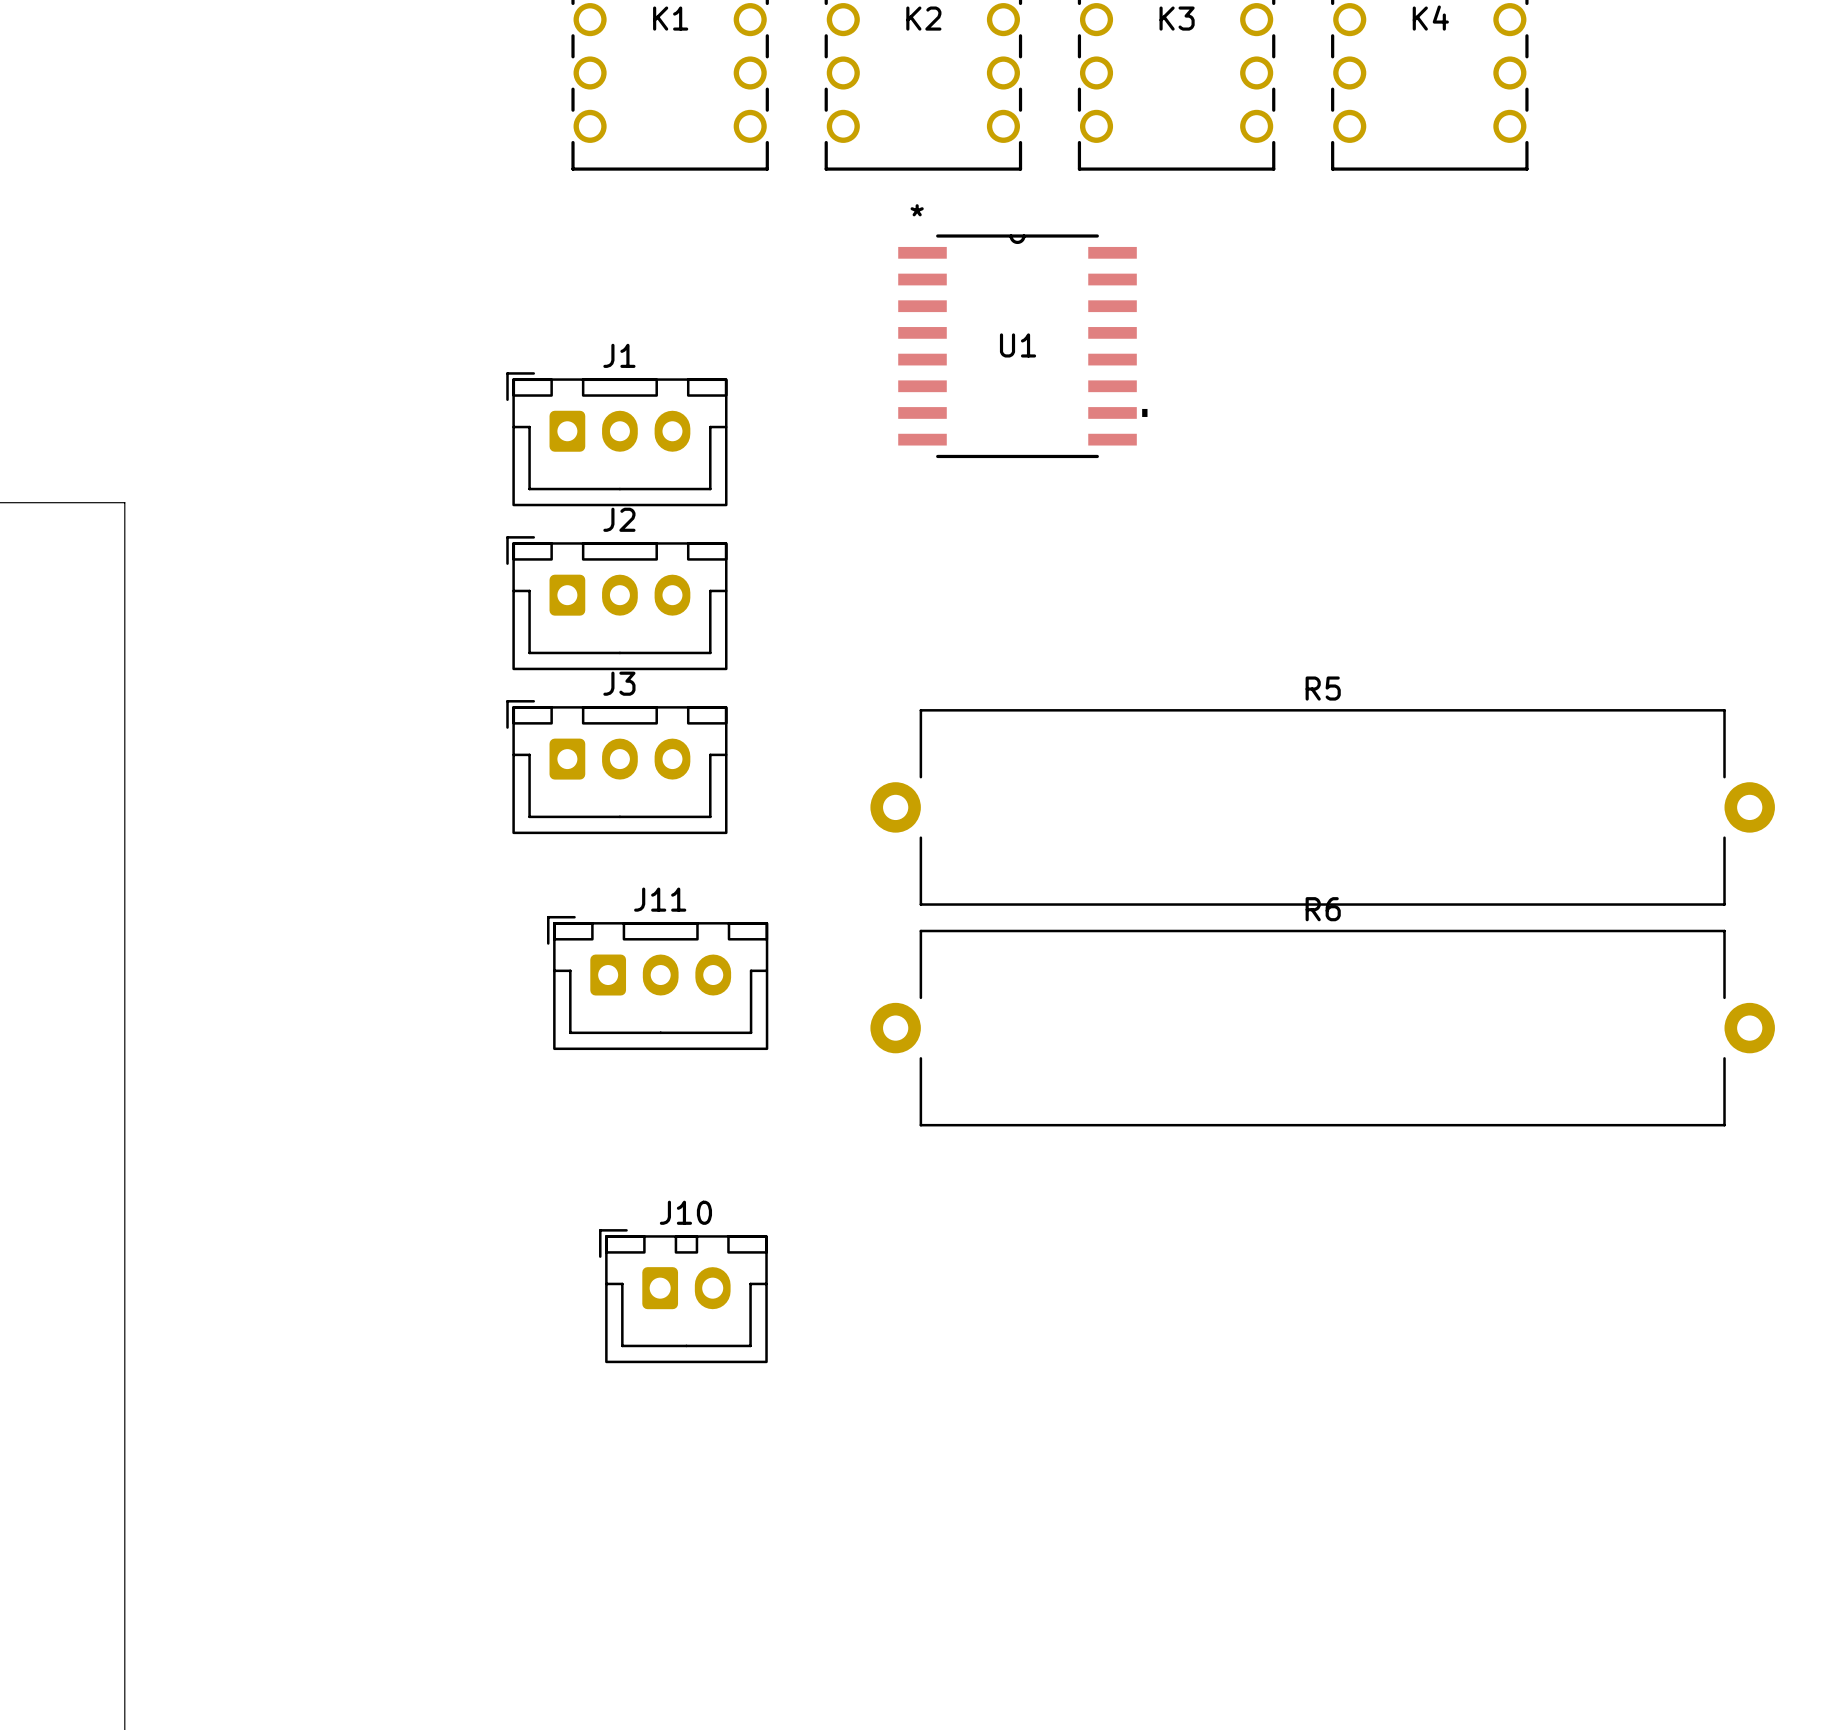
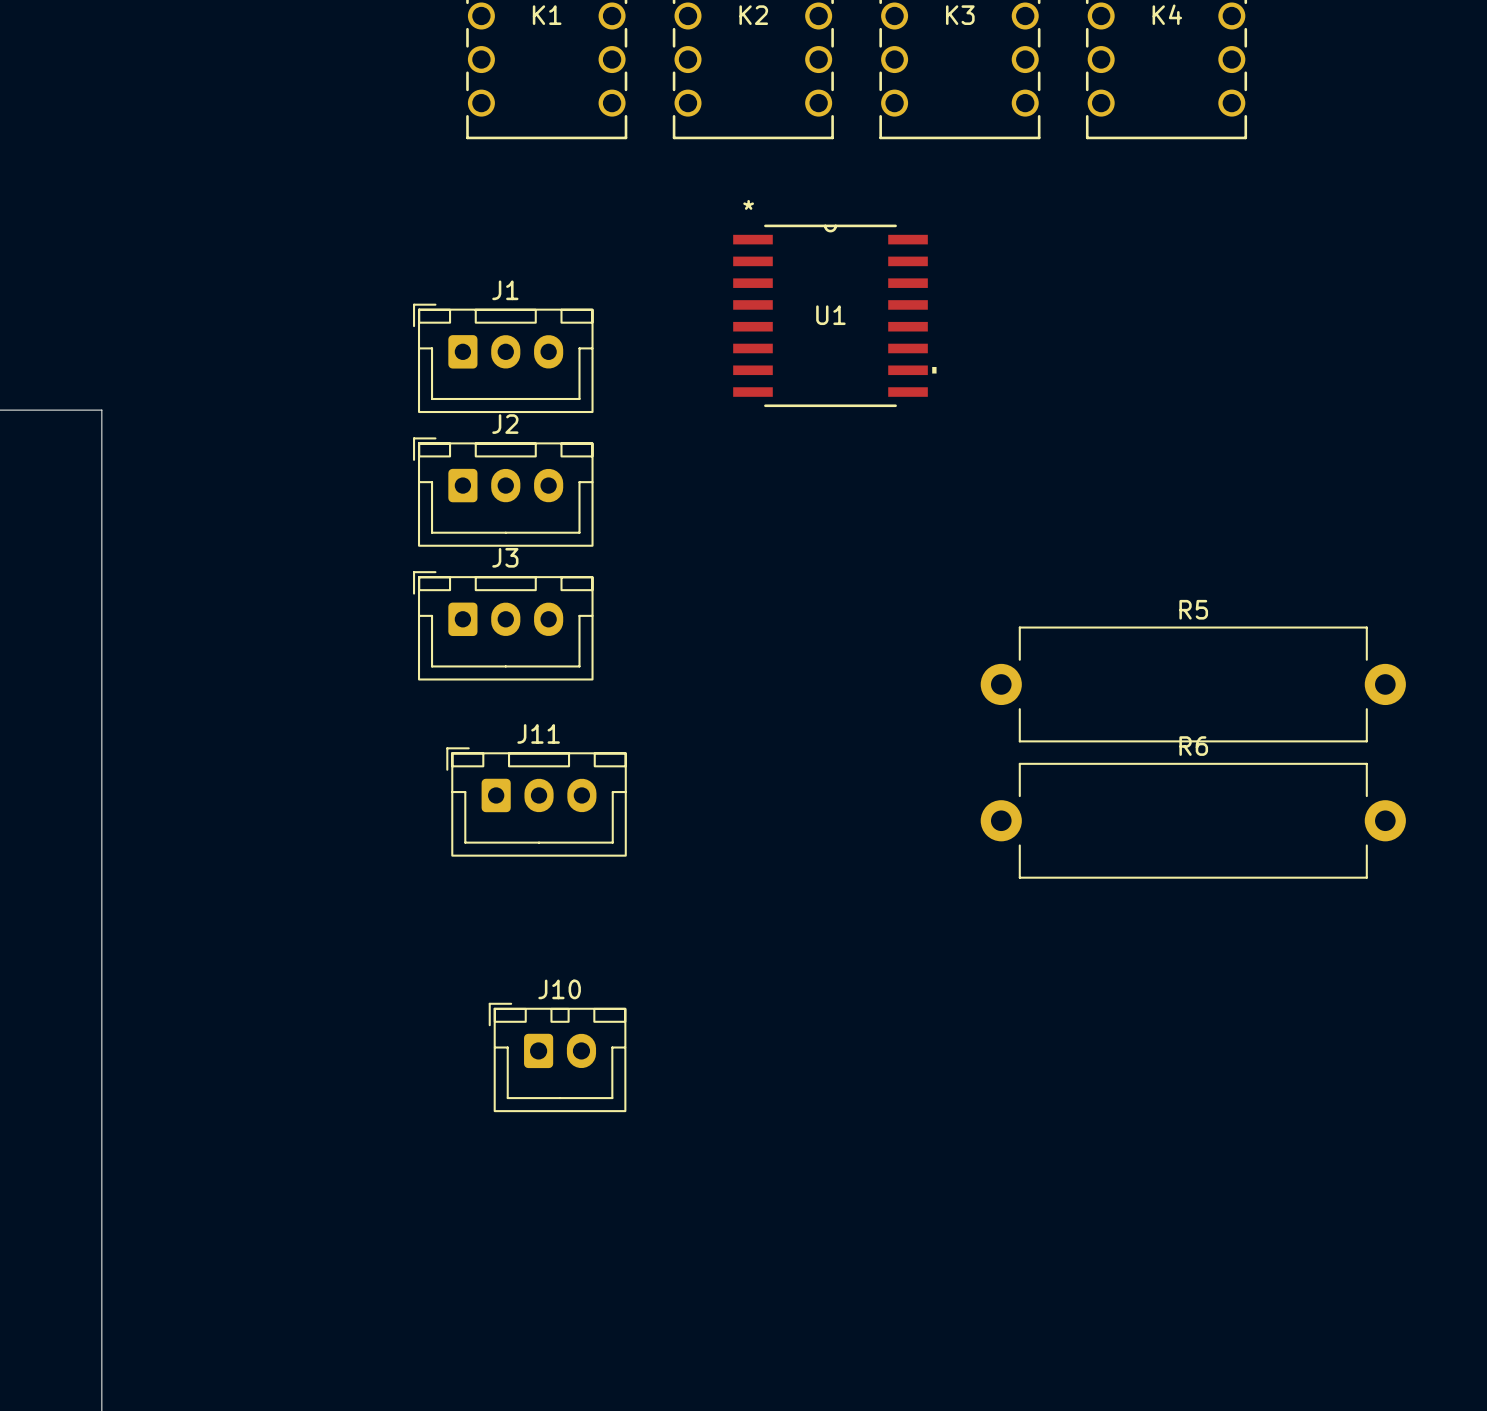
U1 position: (1022, 346) -> (834, 315)
R5 footprint: [870, 709, 1775, 906] -> [980, 626, 1406, 743]
R6 footprint: [870, 929, 1775, 1127] -> [980, 762, 1406, 879]

